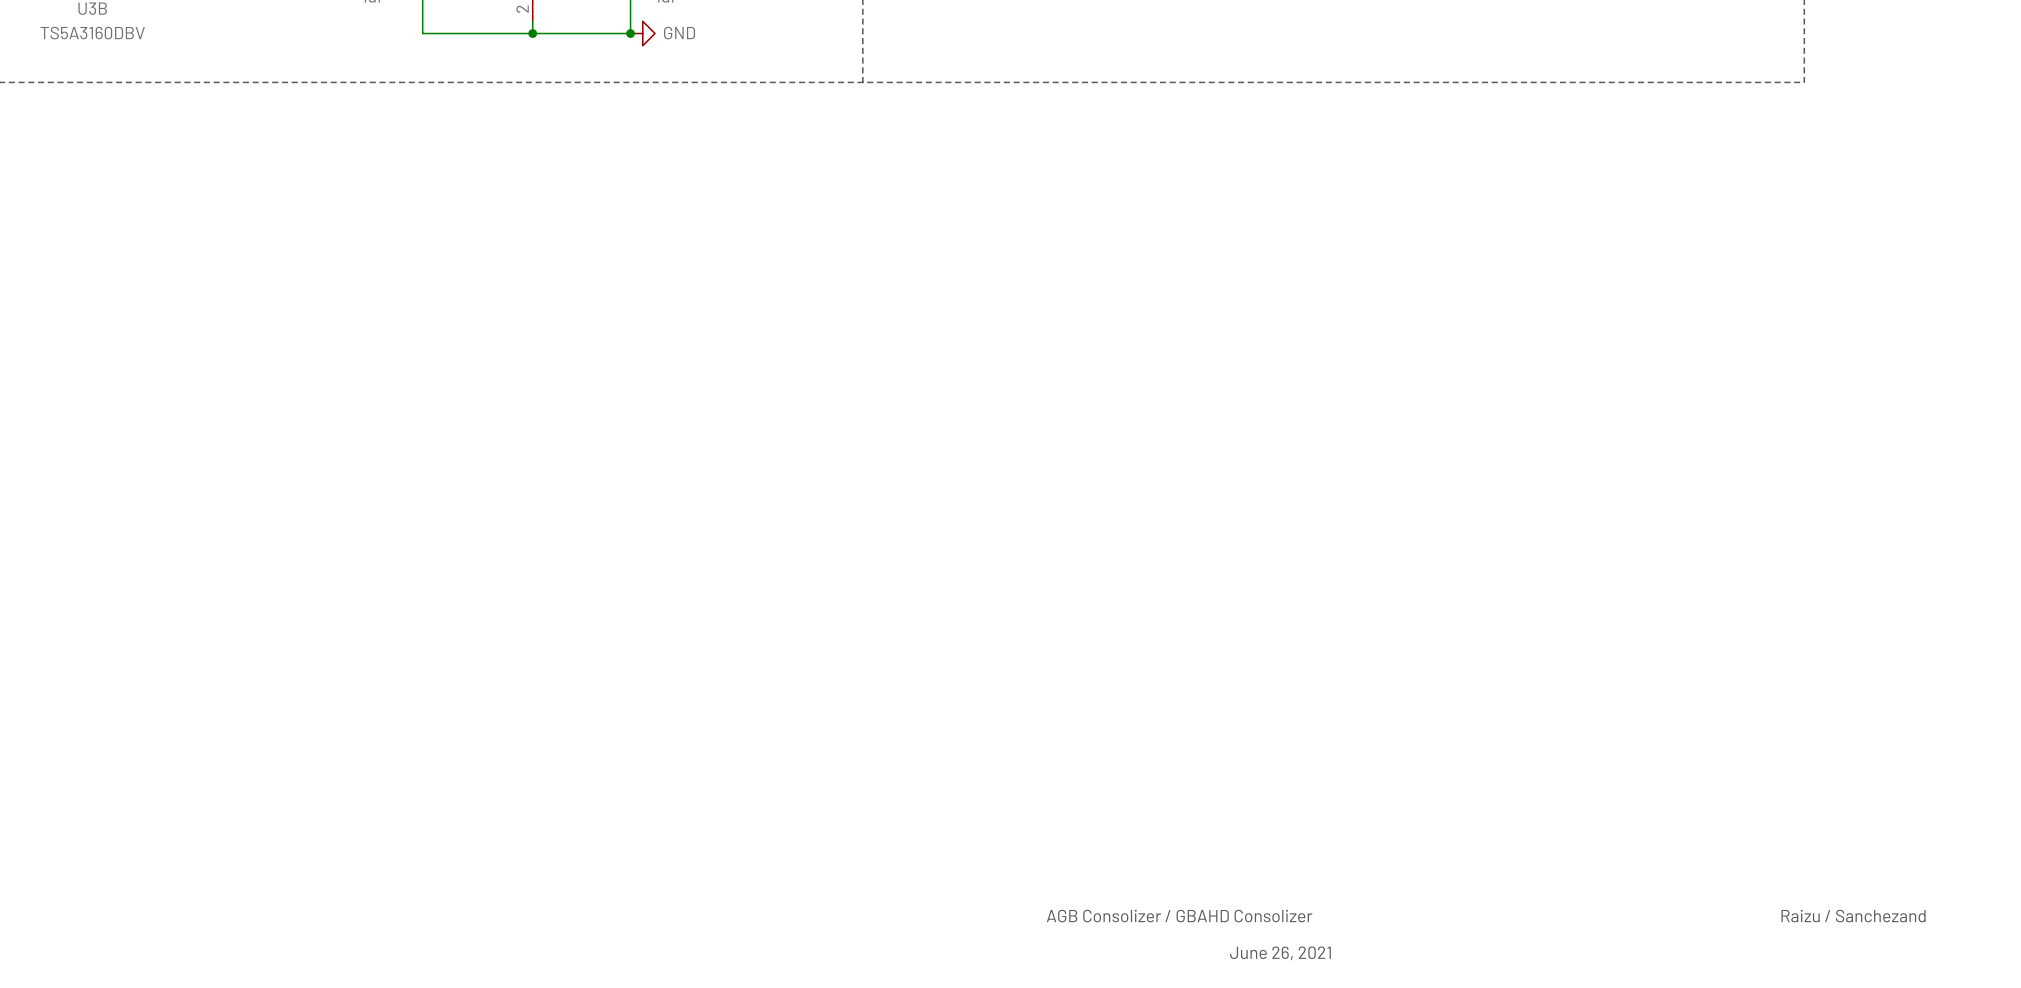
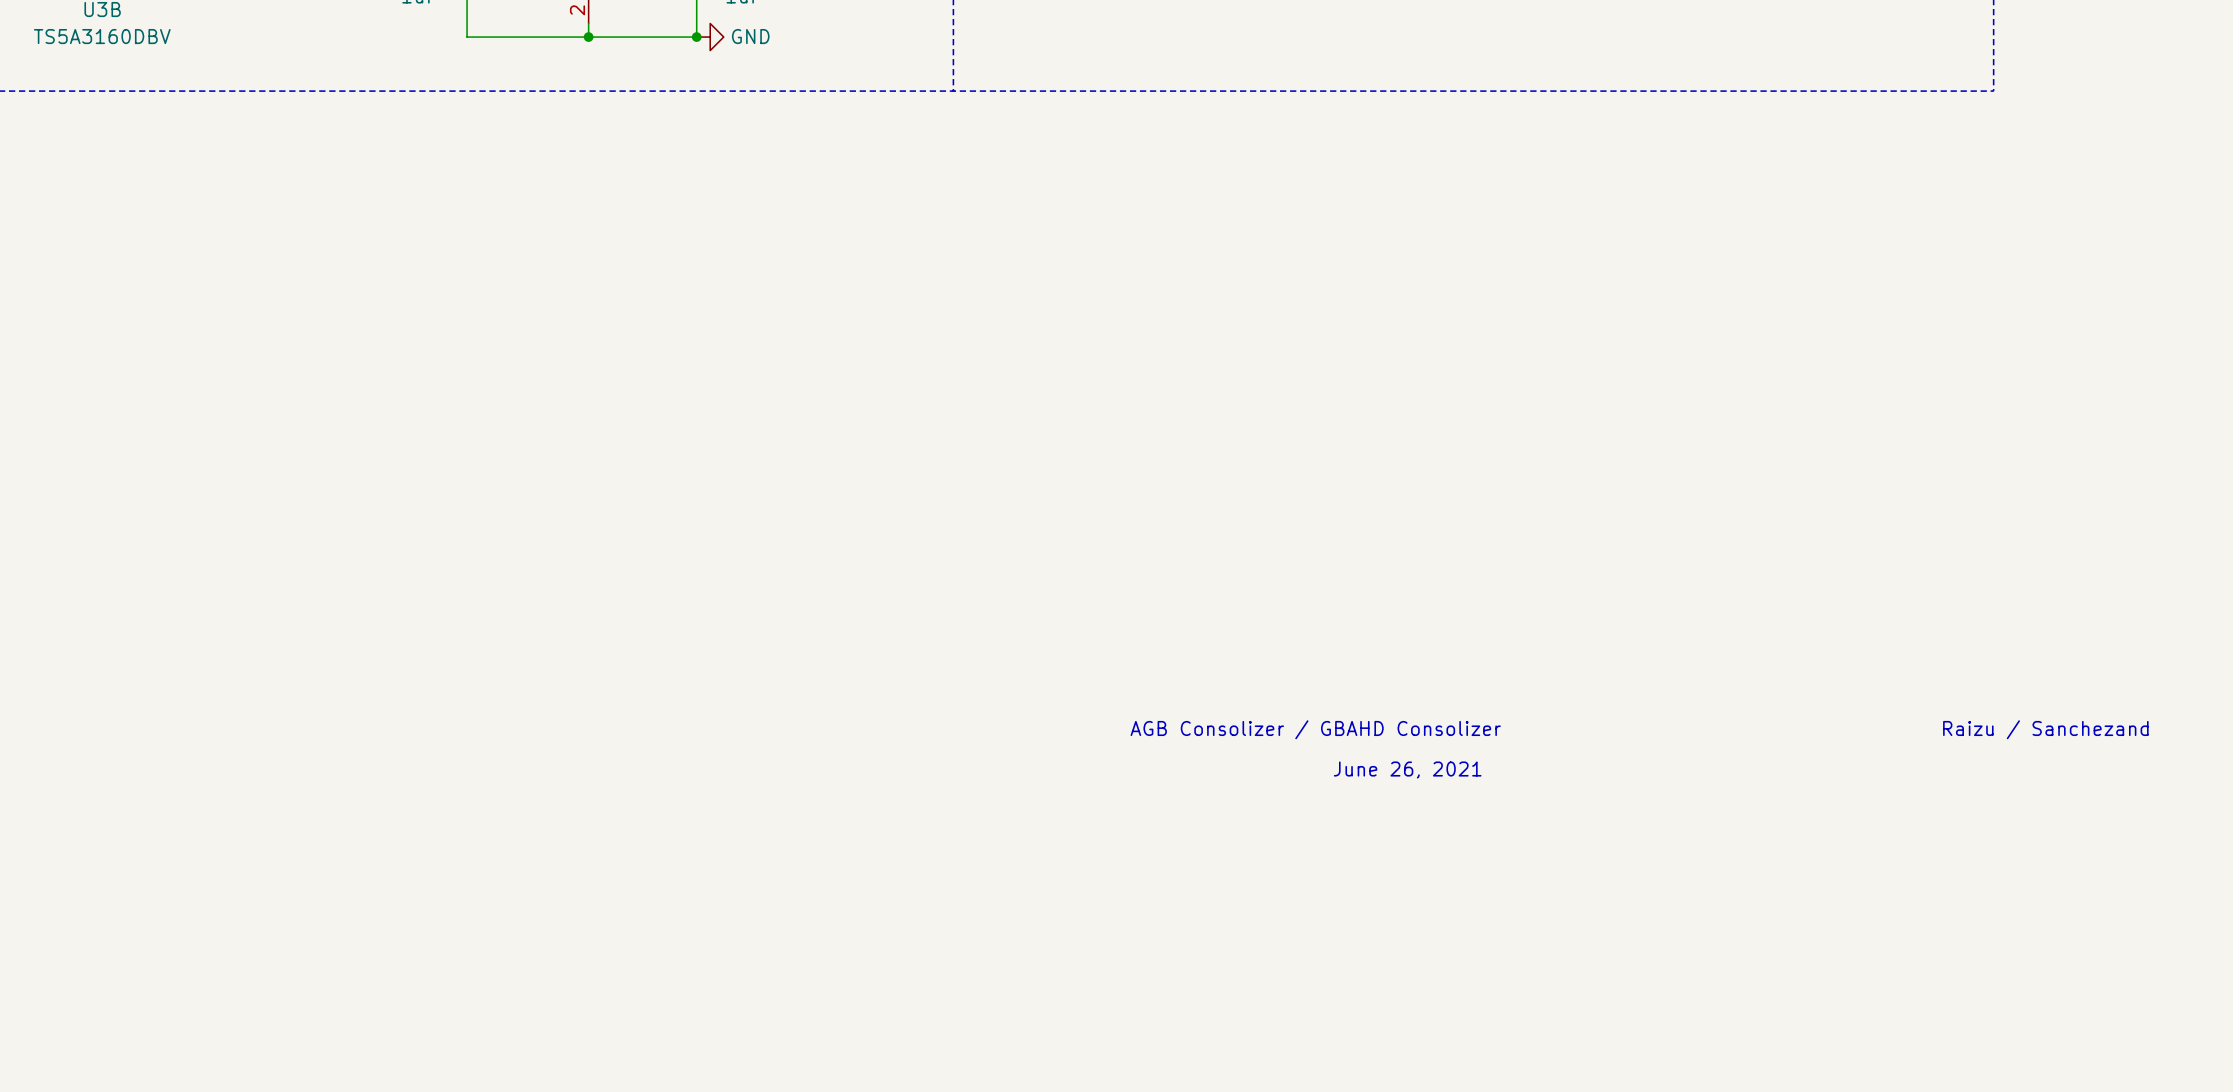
text: none -> AGB Consolizer / GBAHD Consolizer (1315, 729)
text: none -> Raizu / Sanchezand (2045, 729)
text: none -> June 26, 2021 (1407, 769)
text: AGB Consolizer / GBAHD Consolizer (1179, 916) -> none
text: Raizu / Sanchezand (1853, 916) -> none
text: June 26, 2021 (1280, 953) -> none

